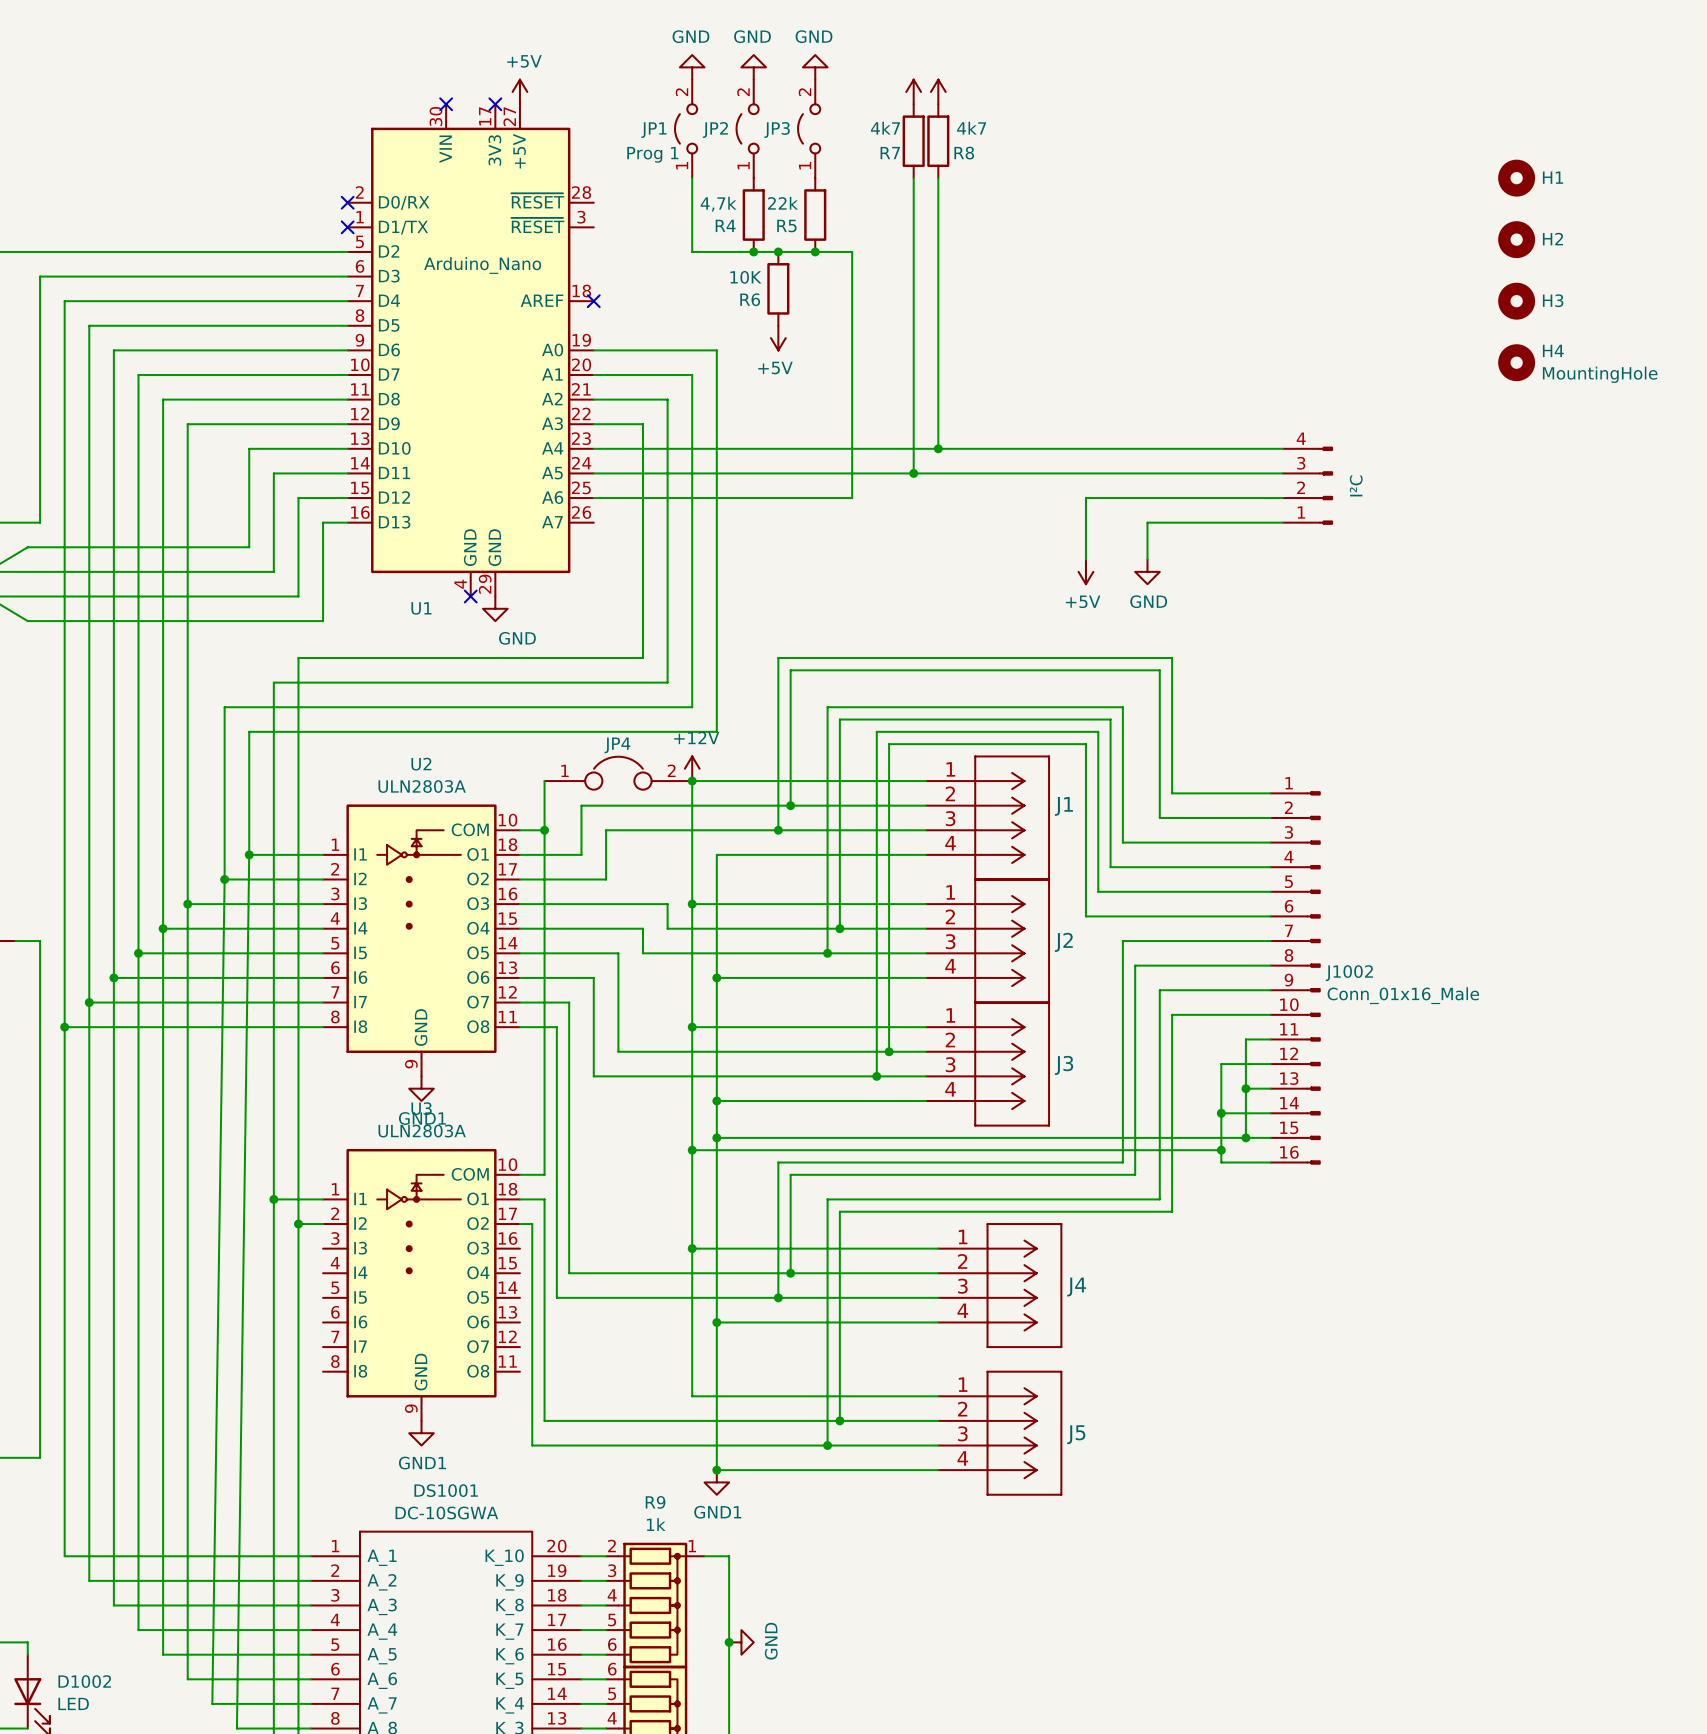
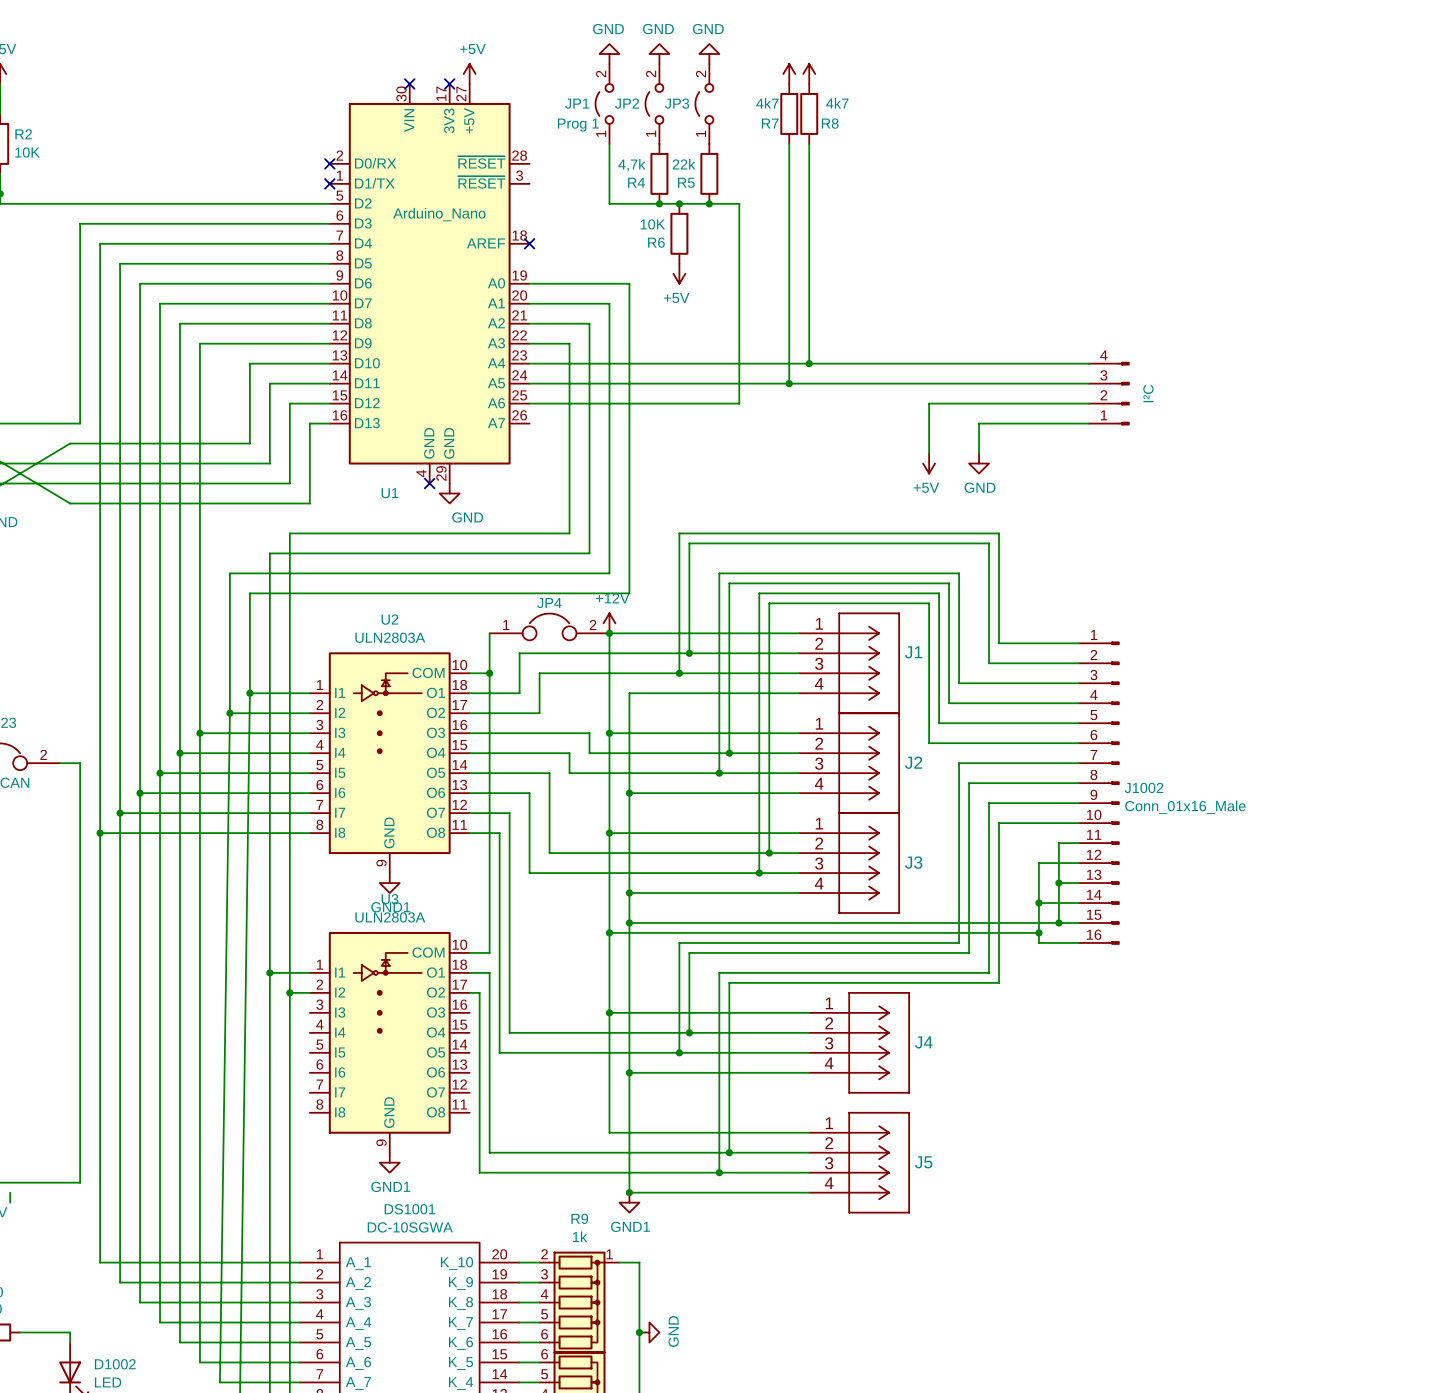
H1: (1516, 178) -> none
H2: (1516, 239) -> none
H3: (1516, 301) -> none
H4: MountingHole (1516, 362) -> none

